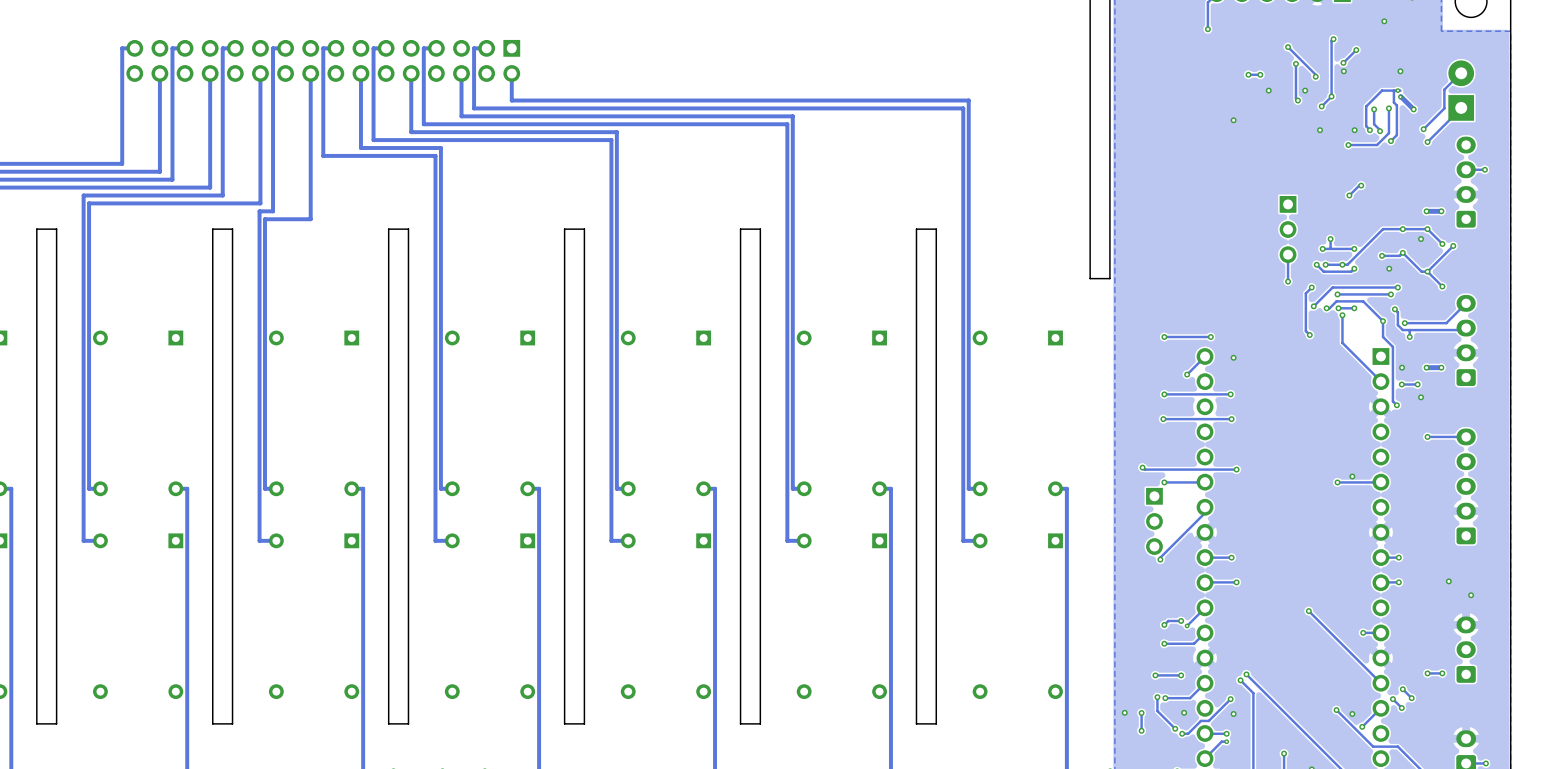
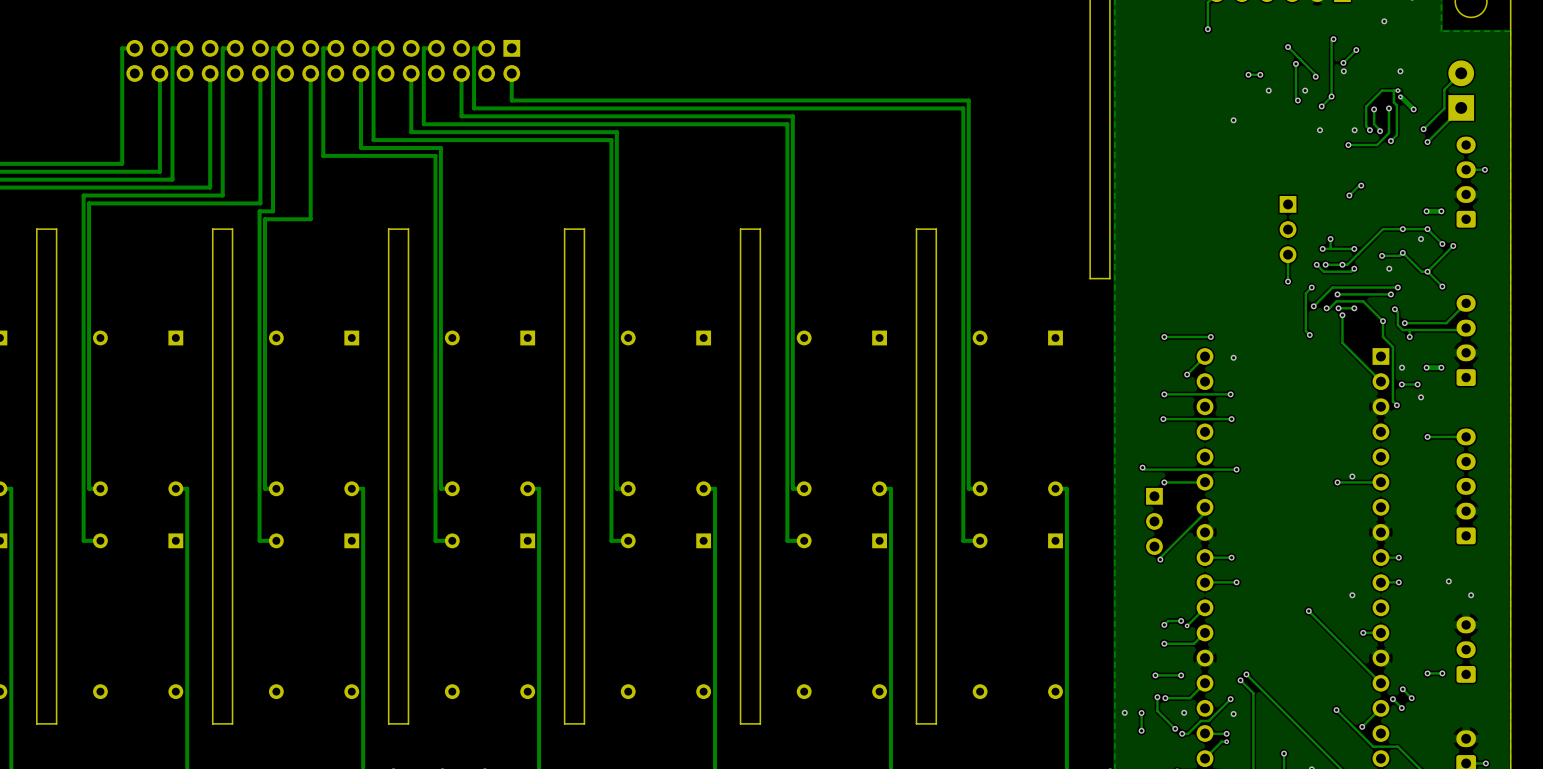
via: none -> (1352, 595)
via: (1352, 714) -> none

